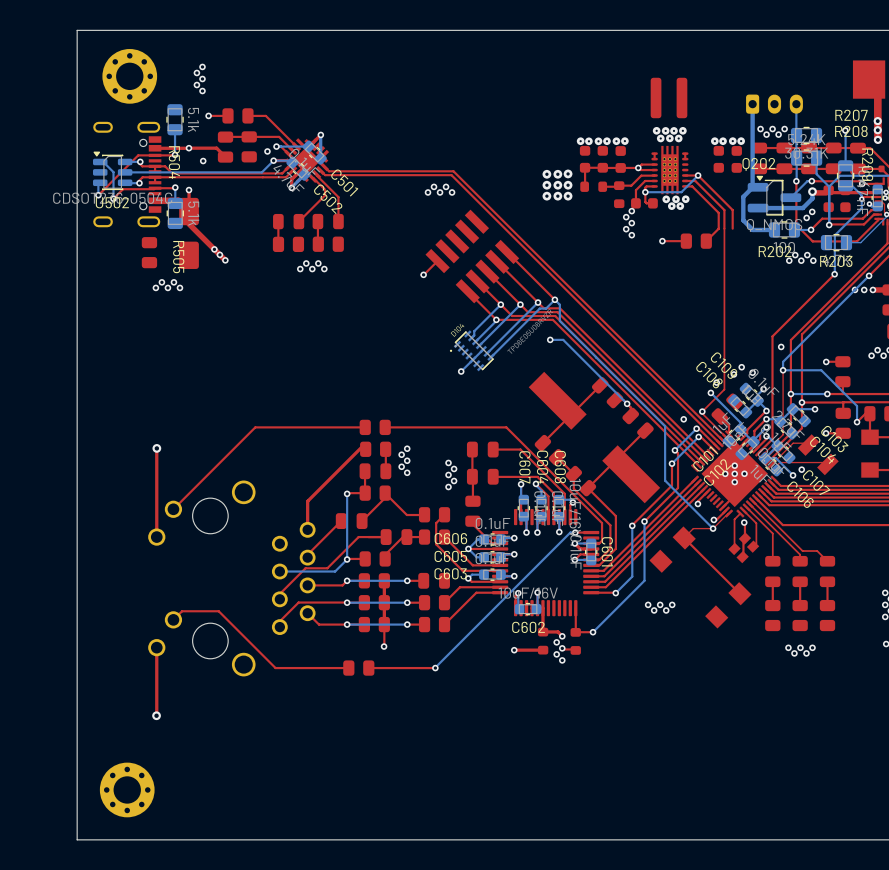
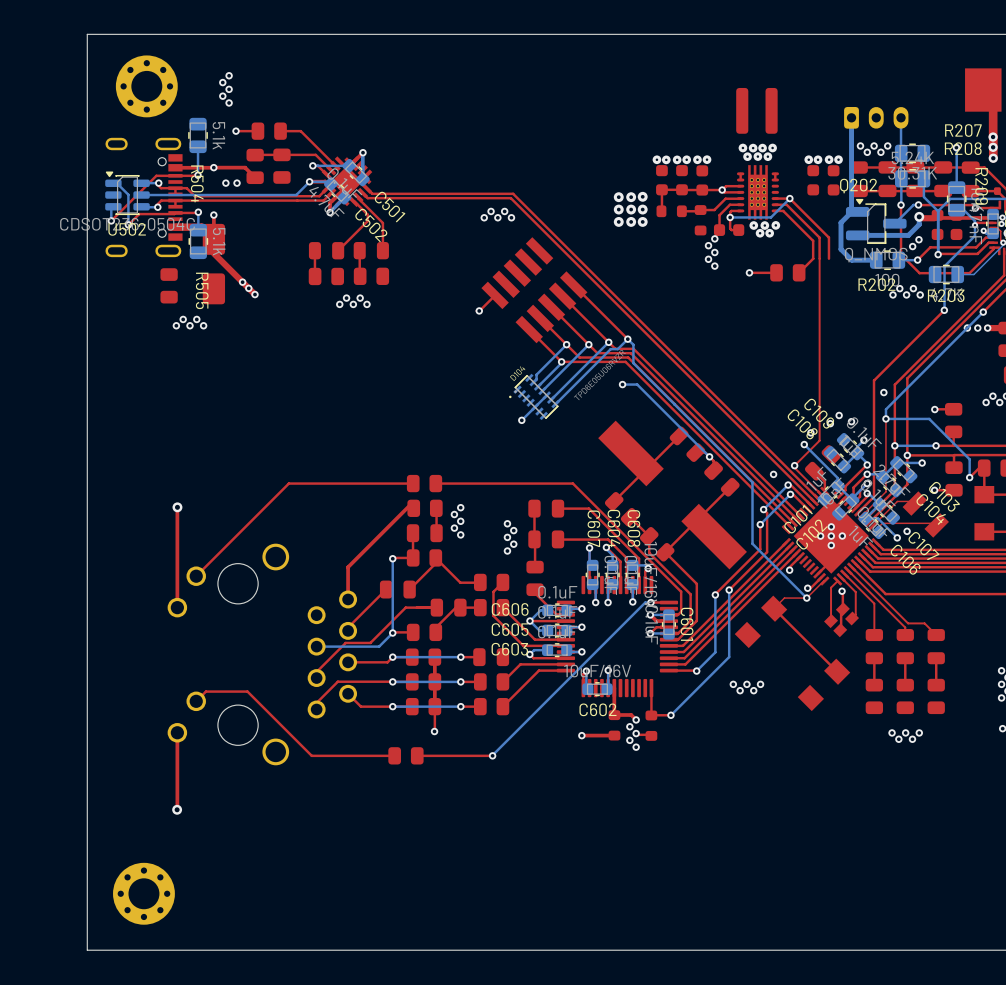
via: (267, 151) -> none
via: none -> (225, 183)
via: (203, 161) -> none
via: none -> (237, 183)

